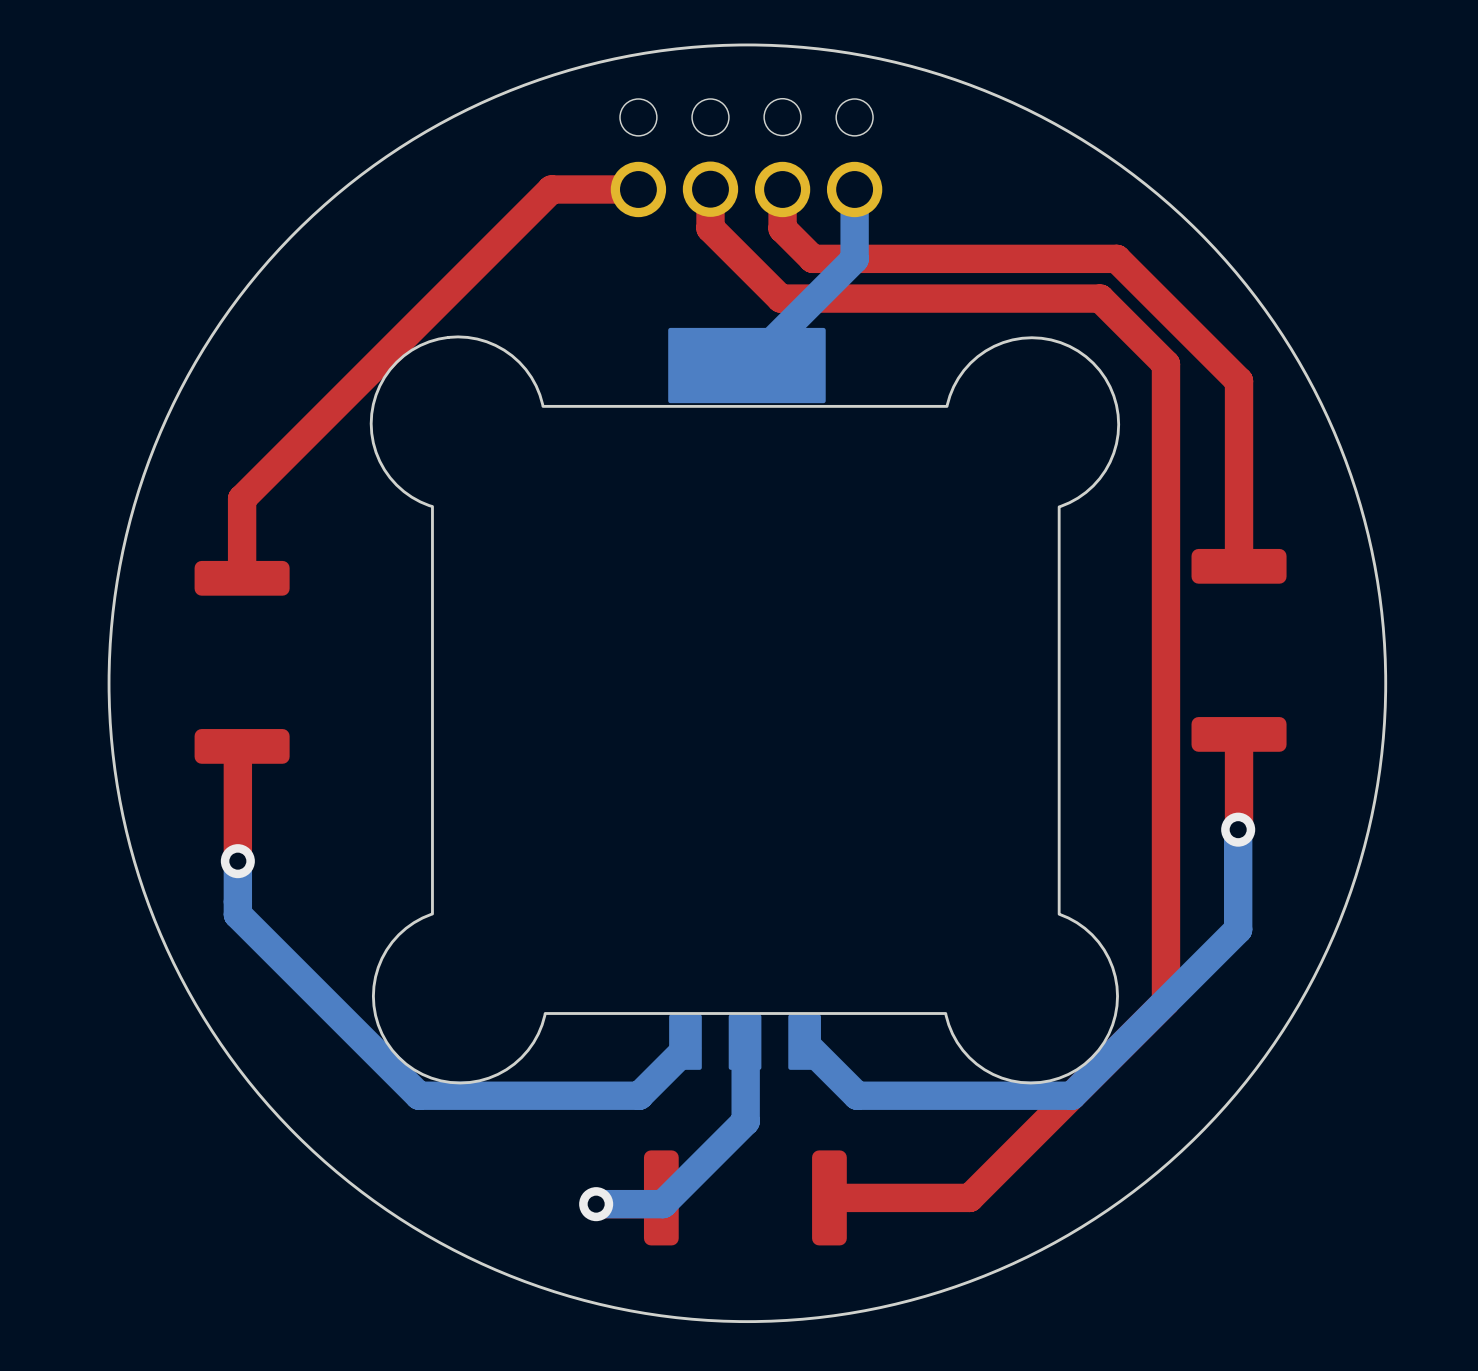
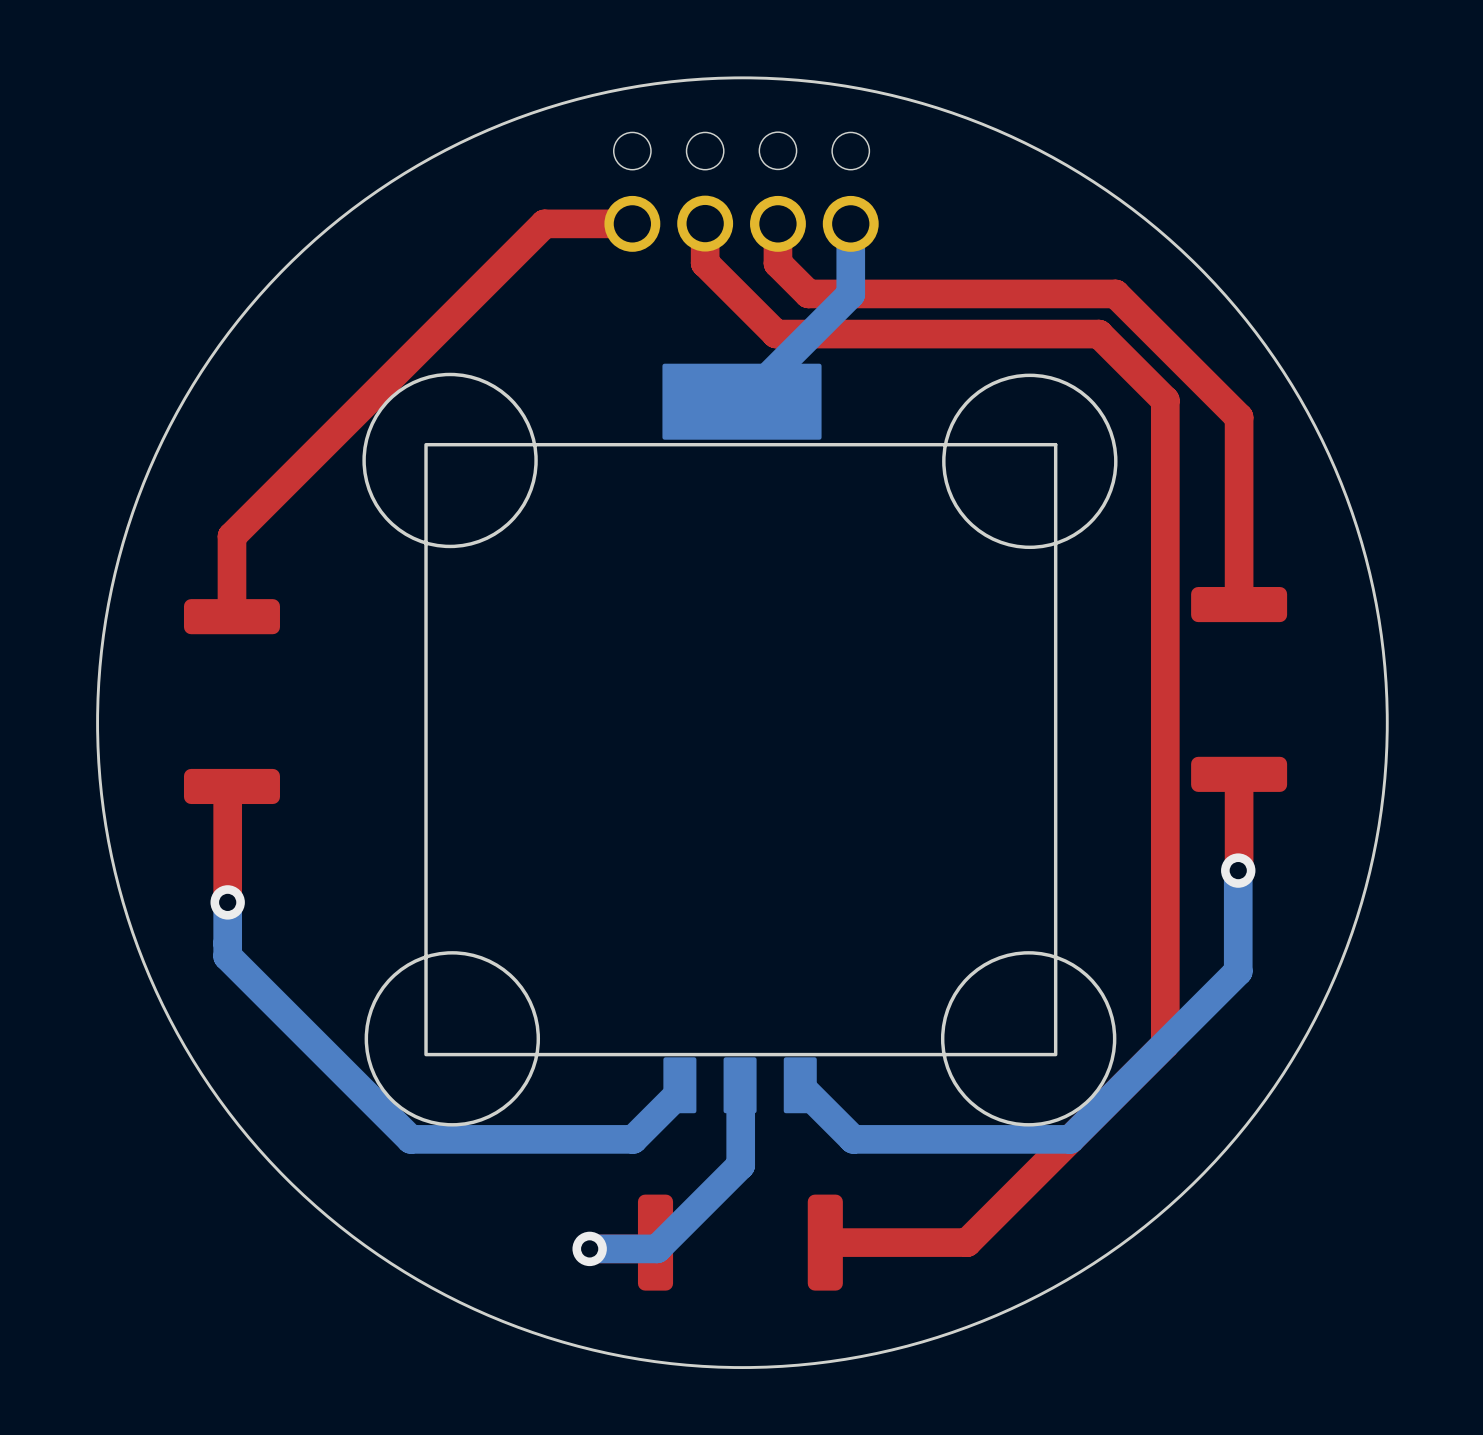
part footprint: [369, 327, 1121, 1085] -> [362, 363, 1118, 1127]

